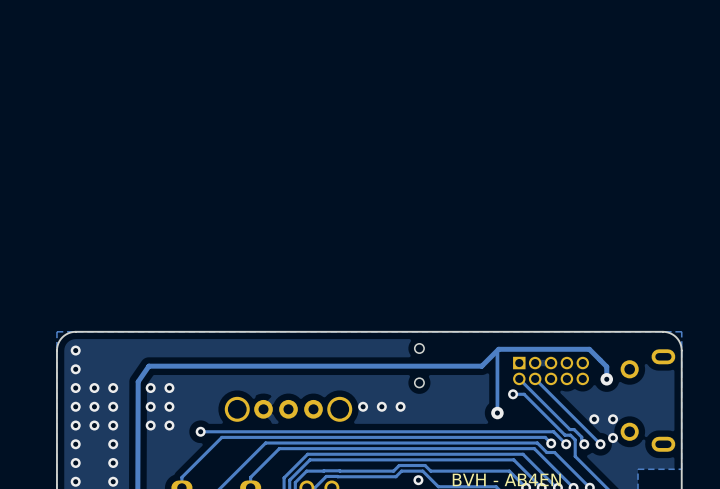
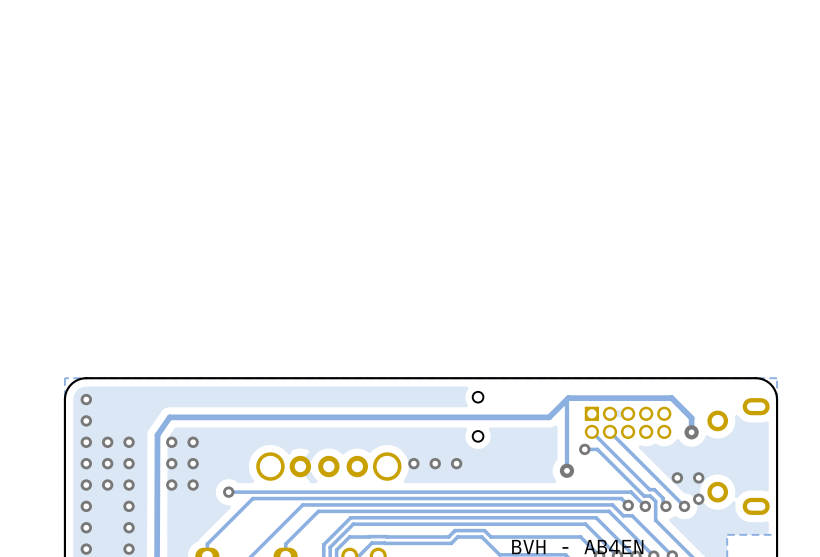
via: (418, 480) -> none

